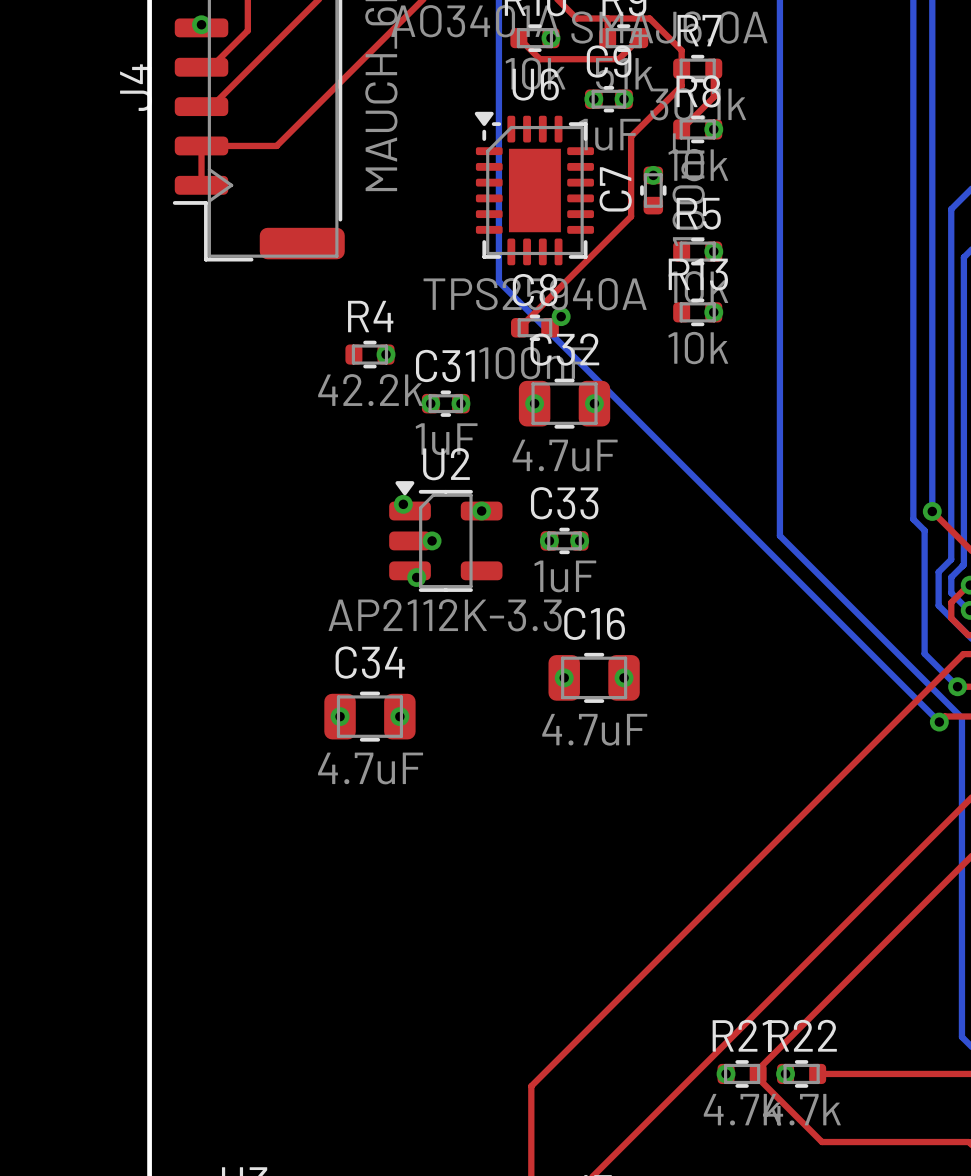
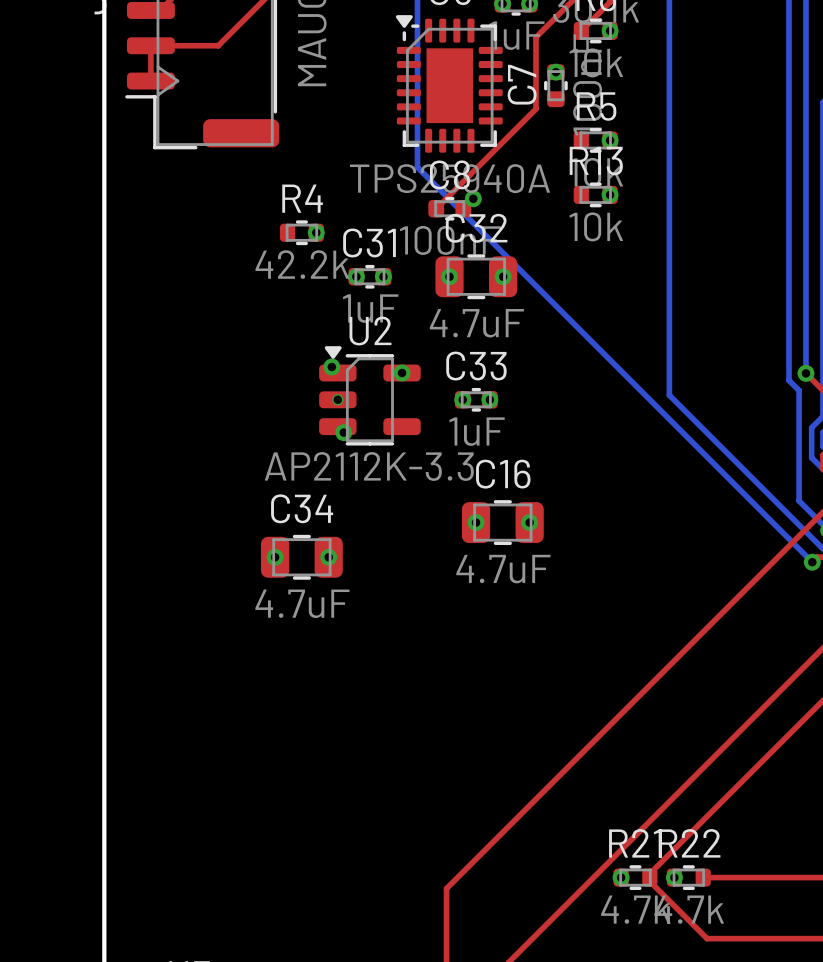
via: none -> (337, 399)
via: (432, 540) -> none

